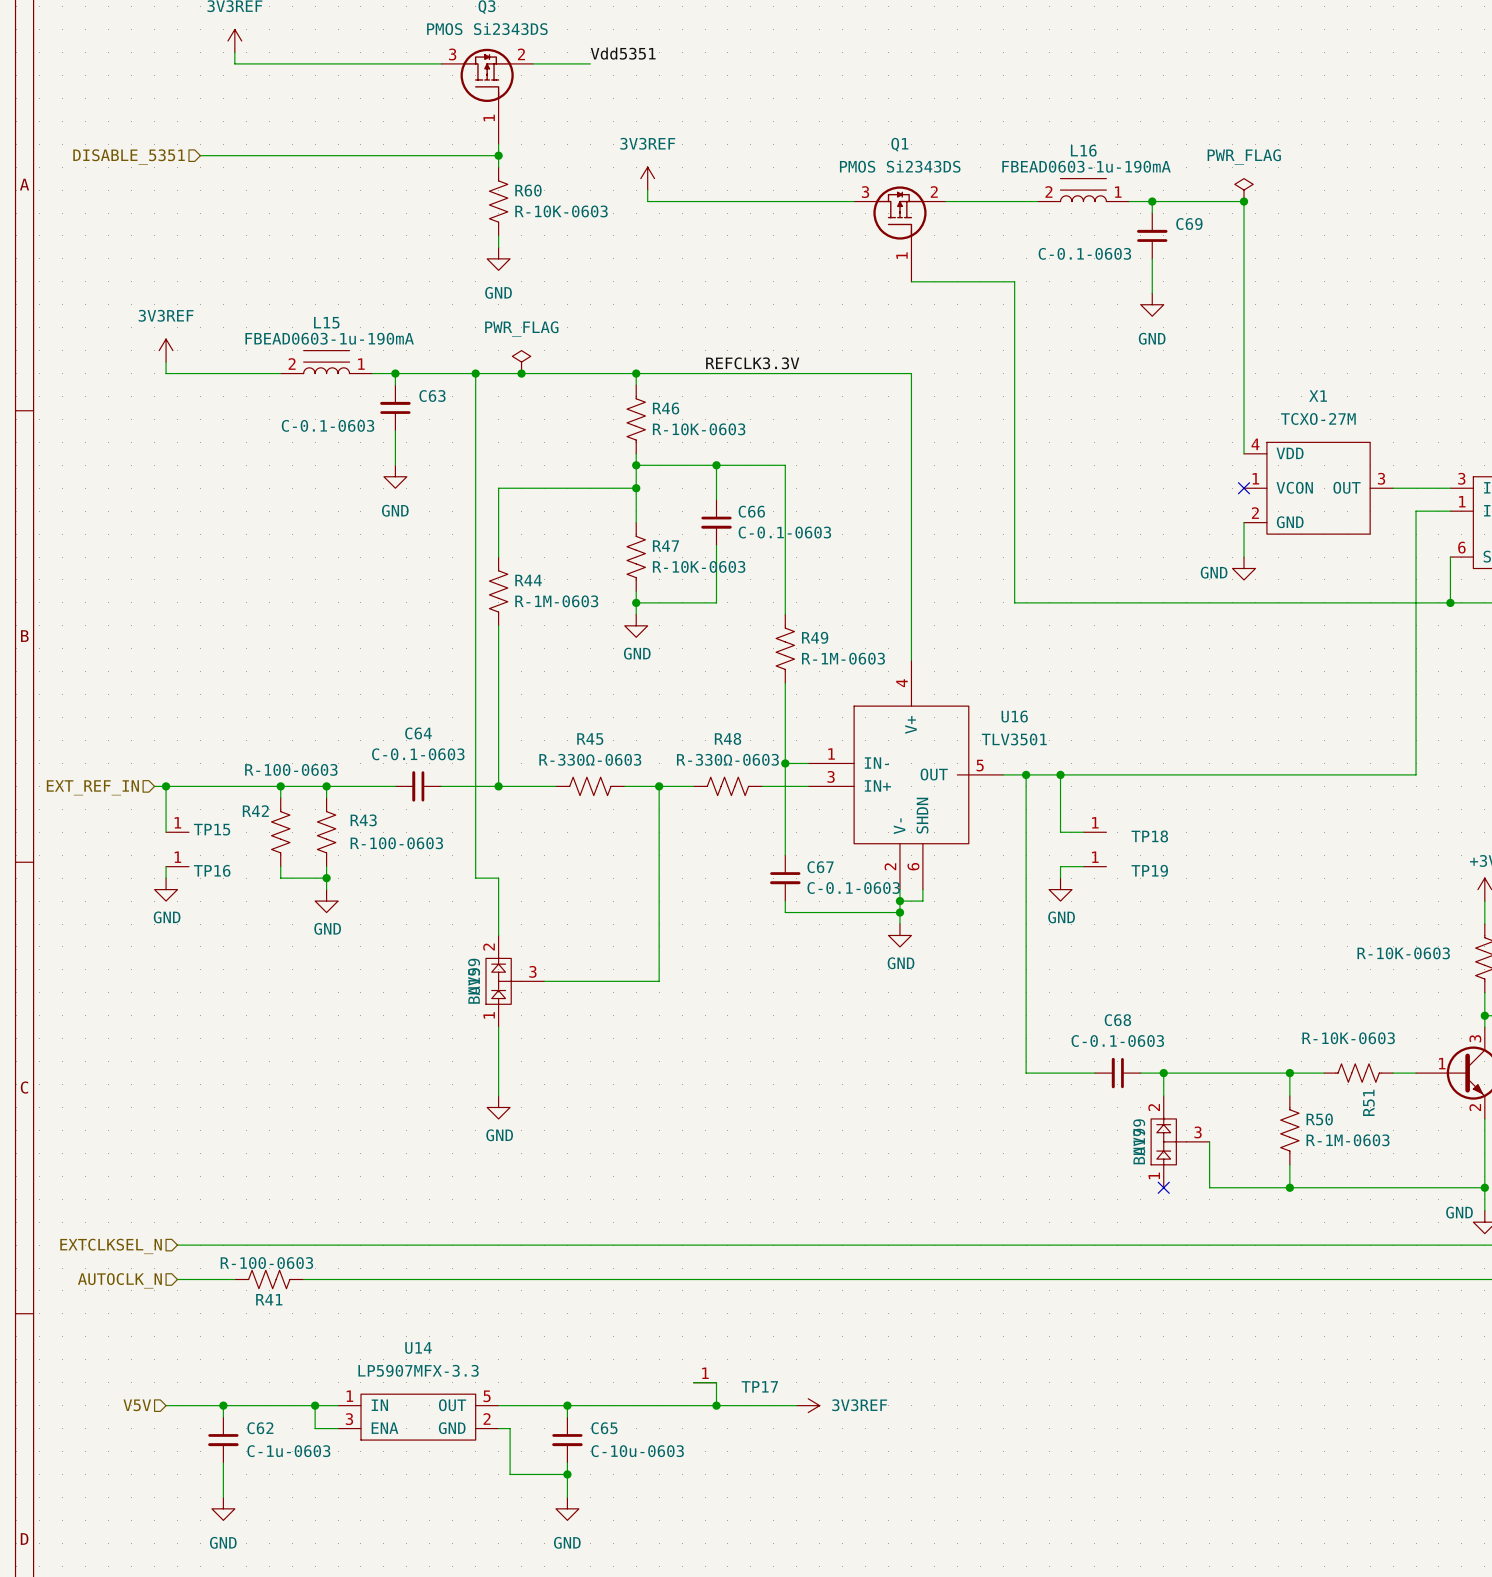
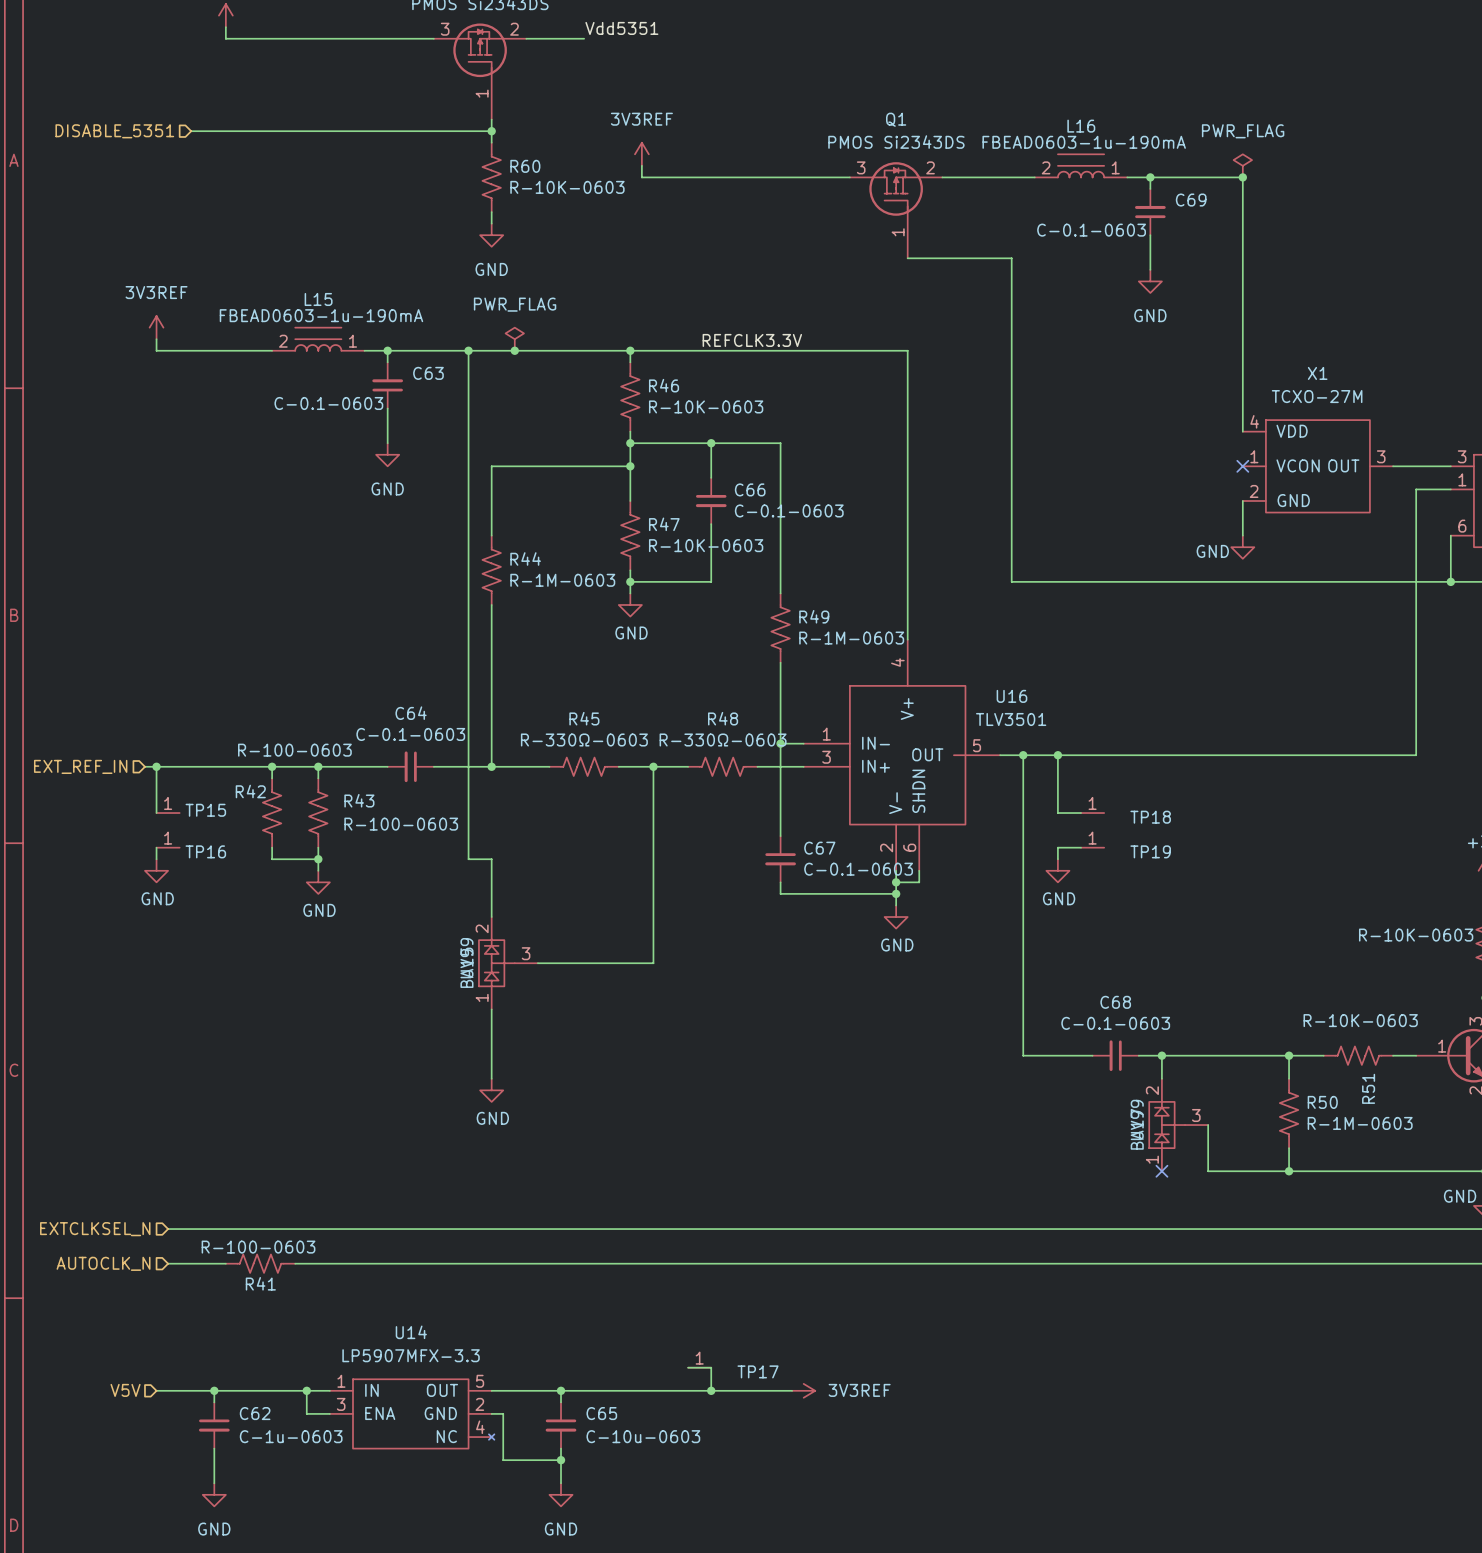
U14 symbol: [338, 1394, 499, 1441] -> [329, 1379, 495, 1449]

